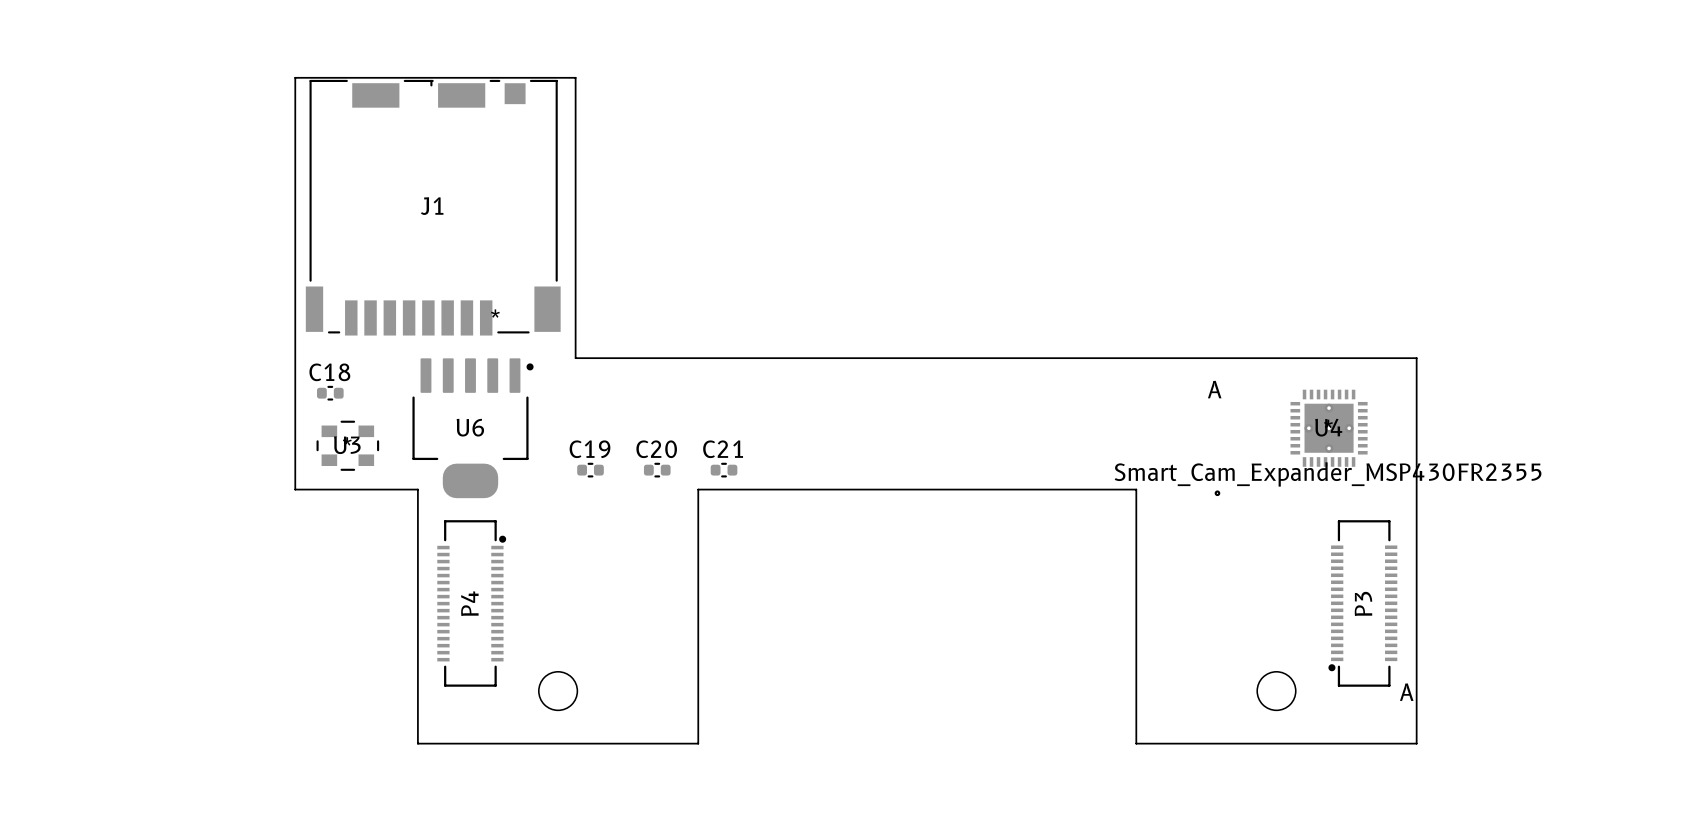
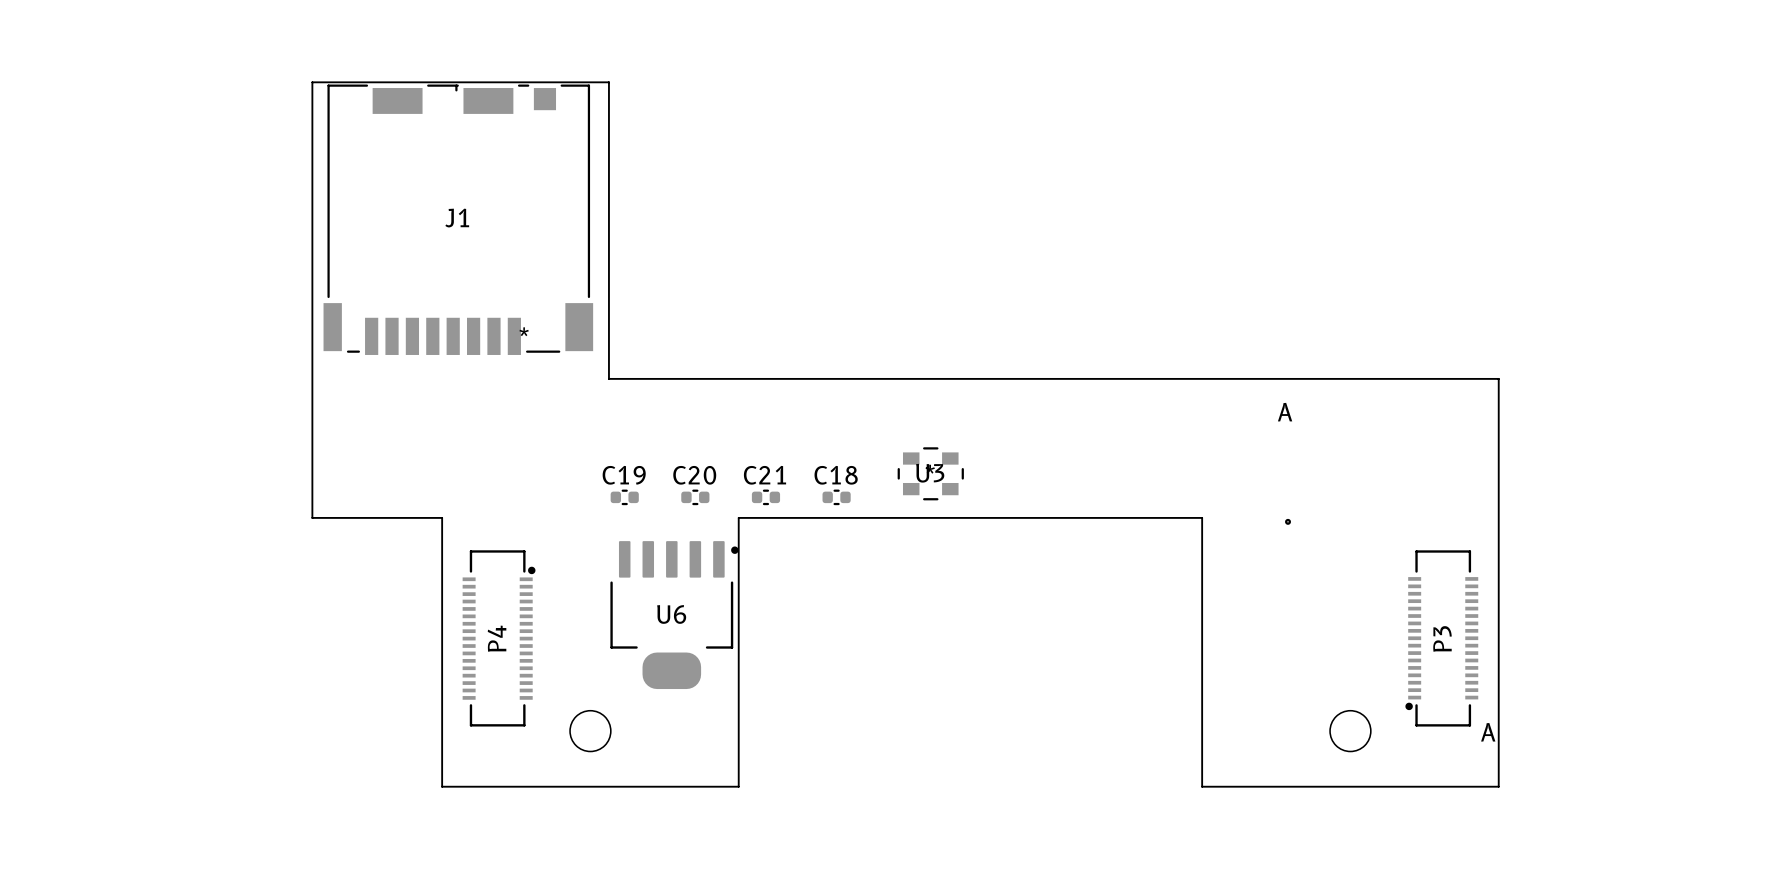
C18 position: (330, 393) -> (836, 497)
U6 position: (473, 428) -> (674, 615)
U4: Smart_Cam_Expander_MSP430FR2355 (1329, 428) -> none
U3 position: (347, 445) -> (930, 473)

